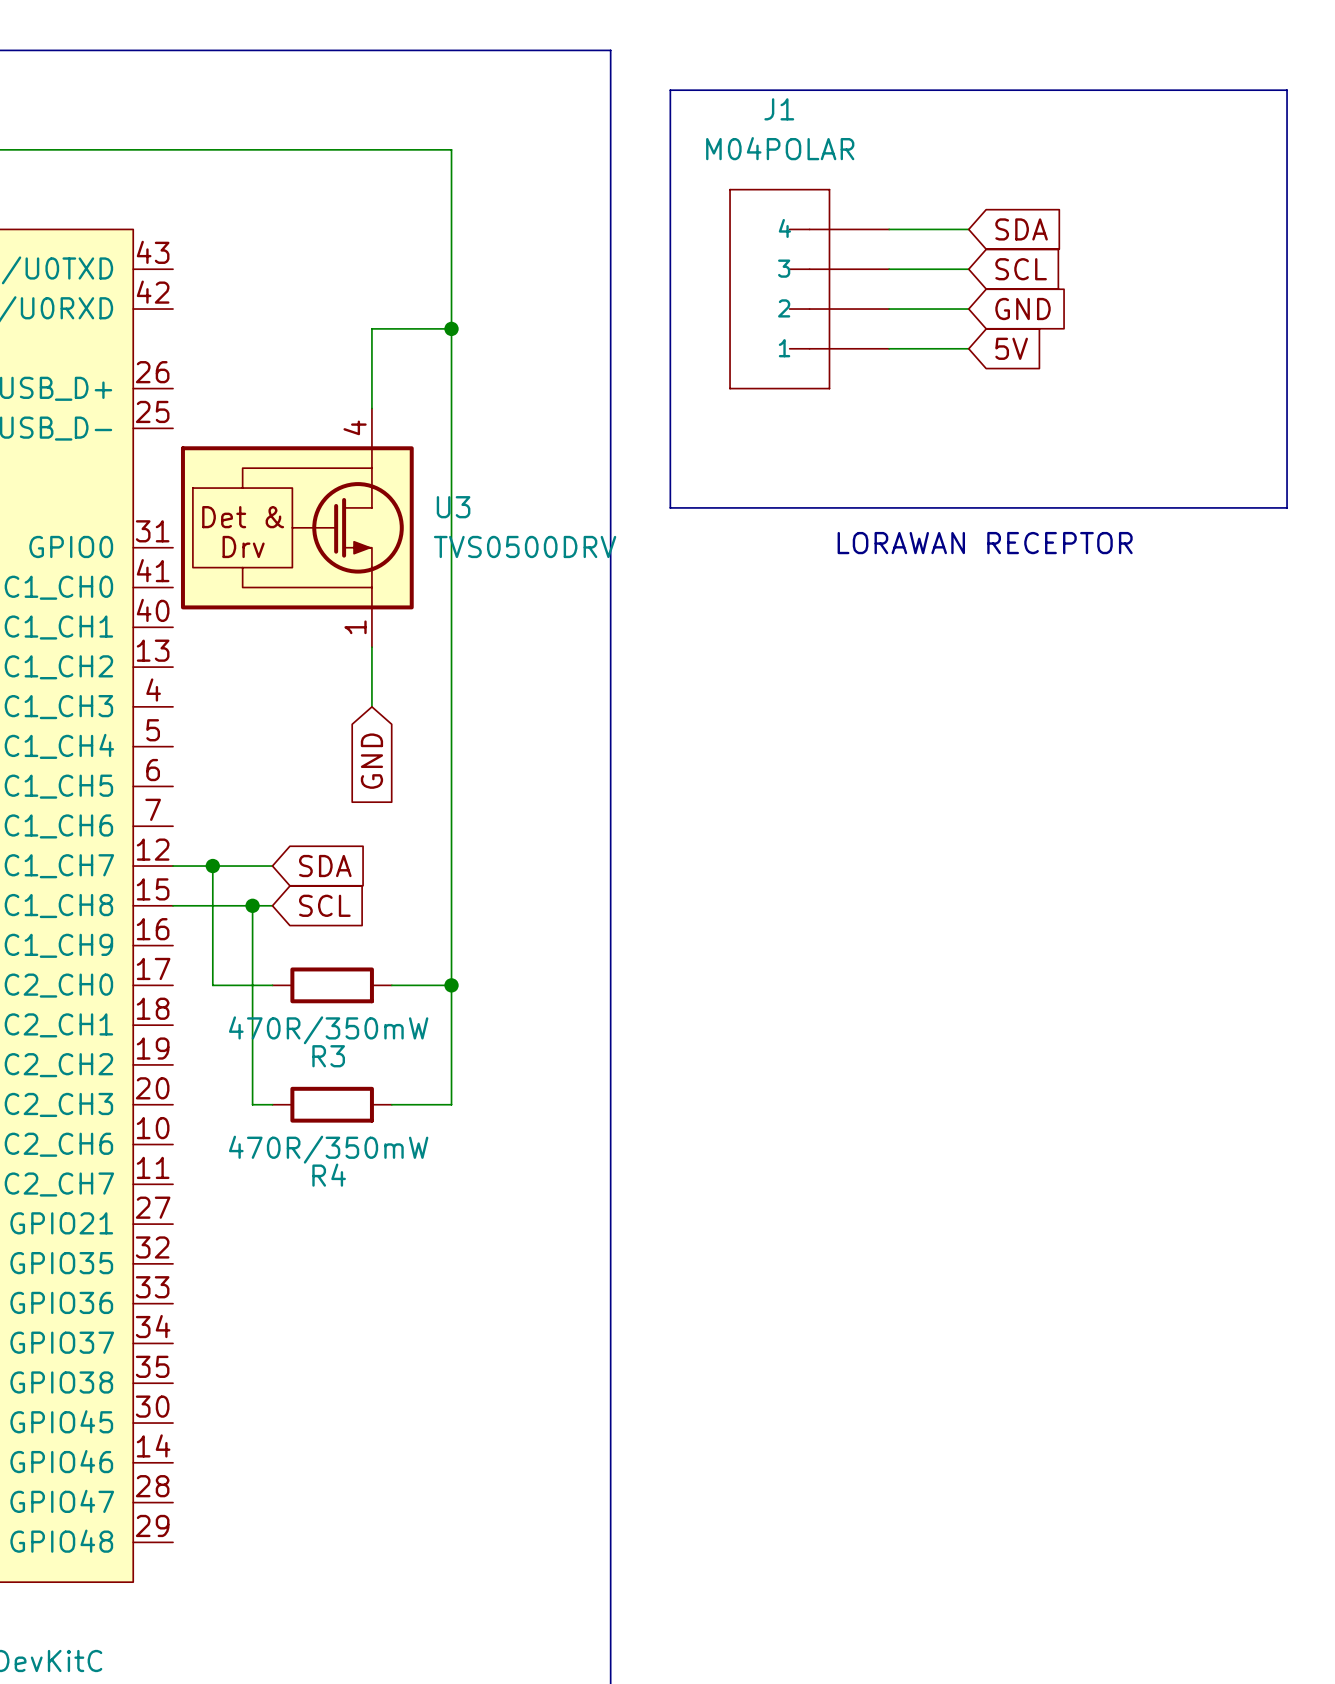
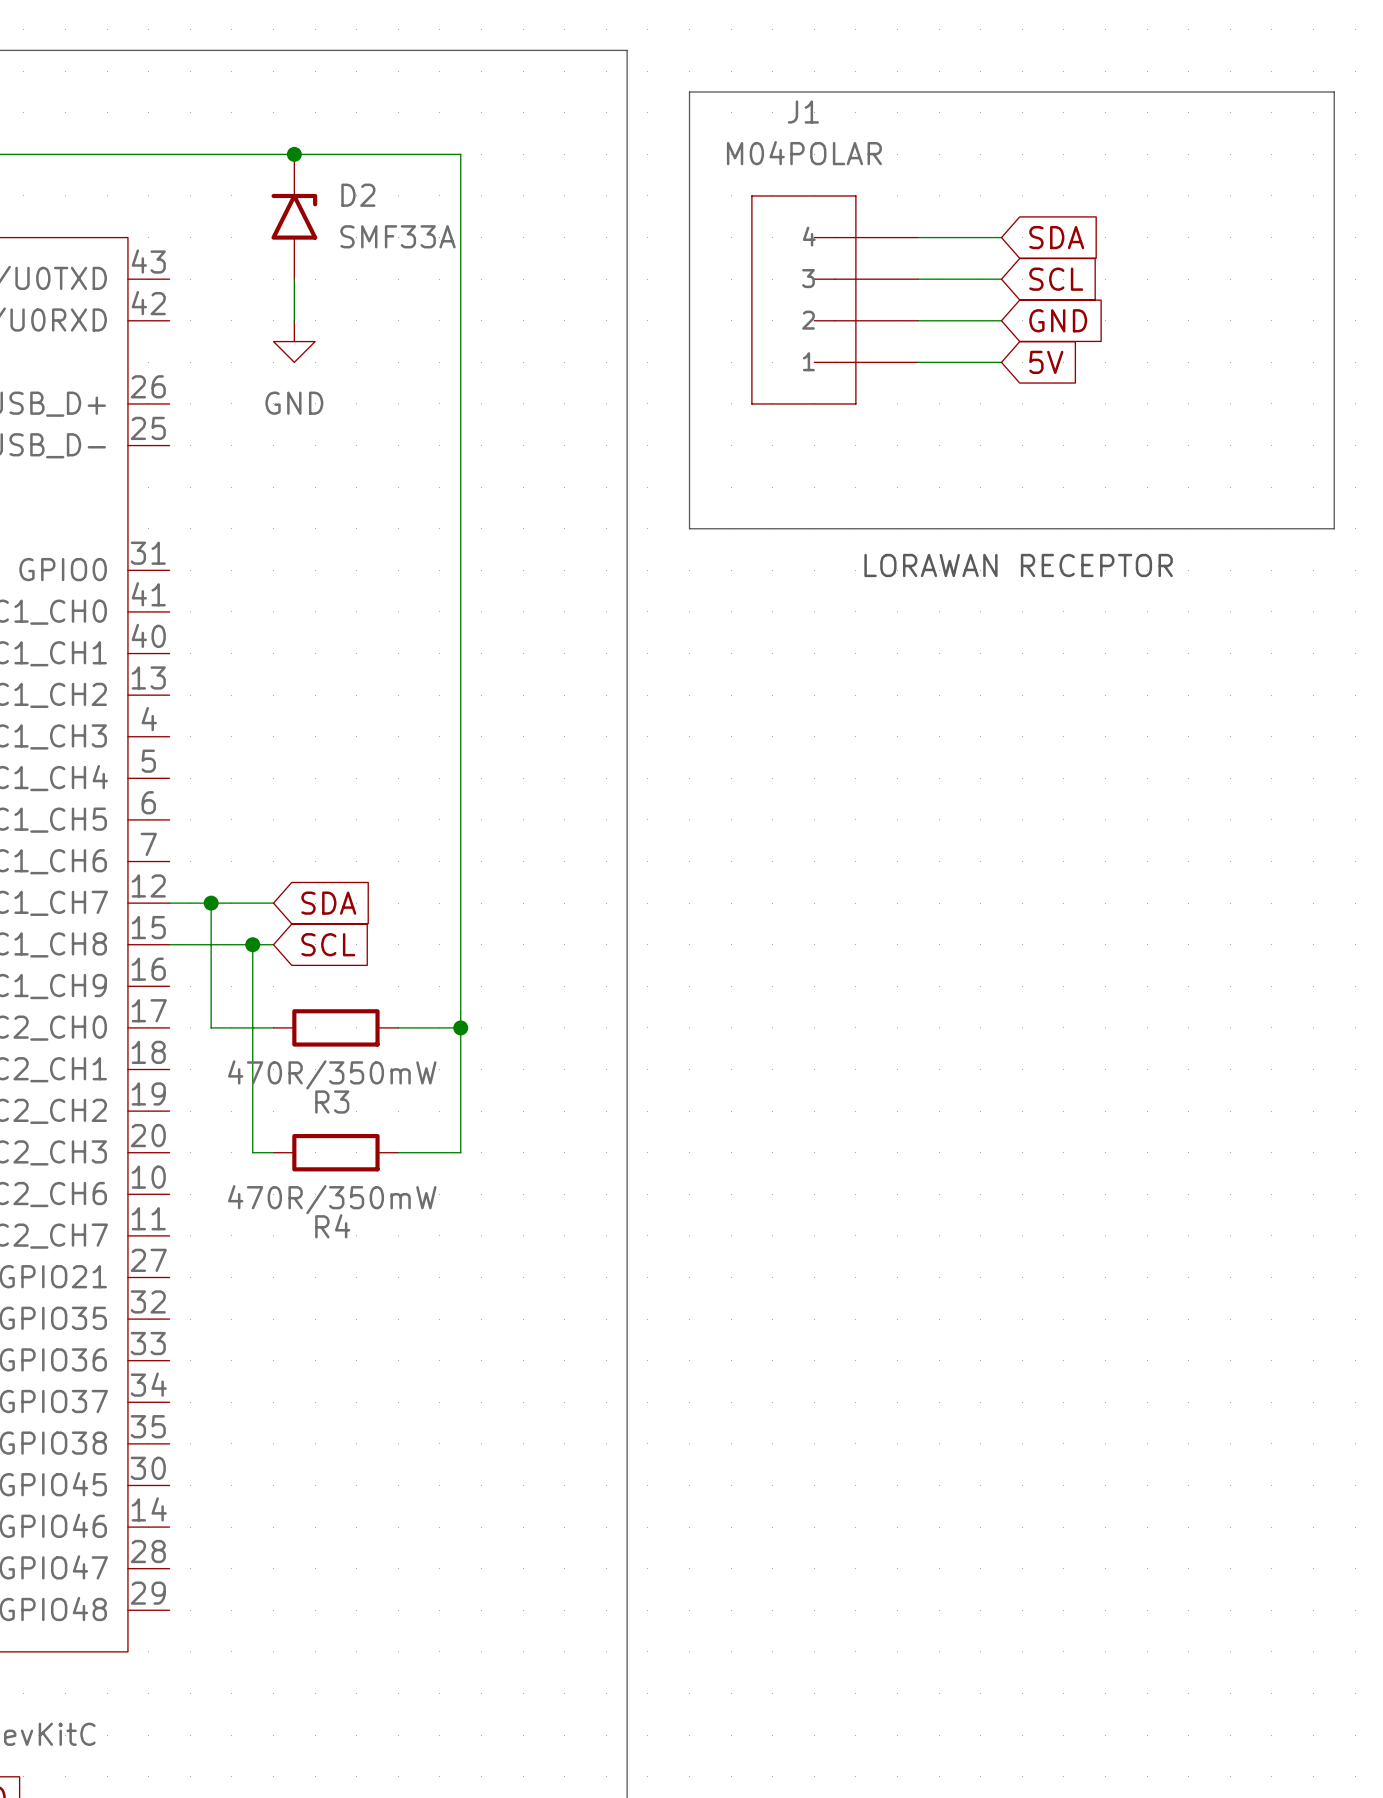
junction: none -> (294, 154)
D2: none -> SMF33A (294, 216)
wire: none -> (294, 279) (294, 320)
power symbol: none -> GND (294, 341)
wire: (451, 328) (371, 328) (371, 408) -> none
junction: (451, 328) -> none
U3: TVS0500DRV (297, 527) -> none
wire: (371, 647) (371, 706) -> none
global label: GND (371, 761) -> none

